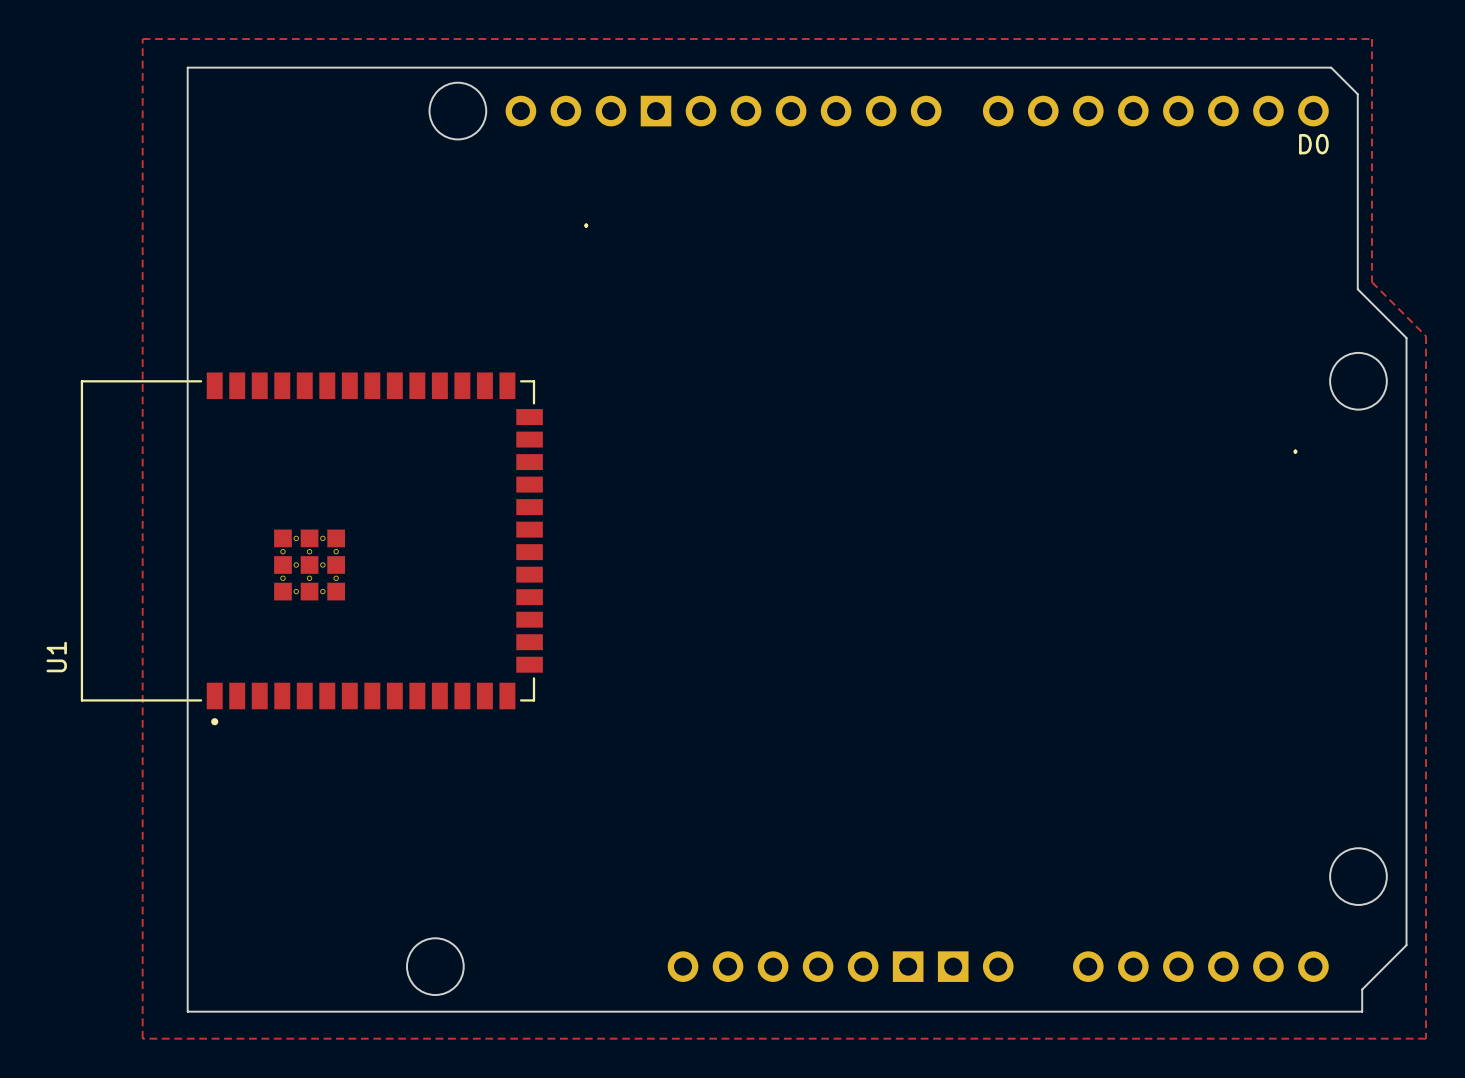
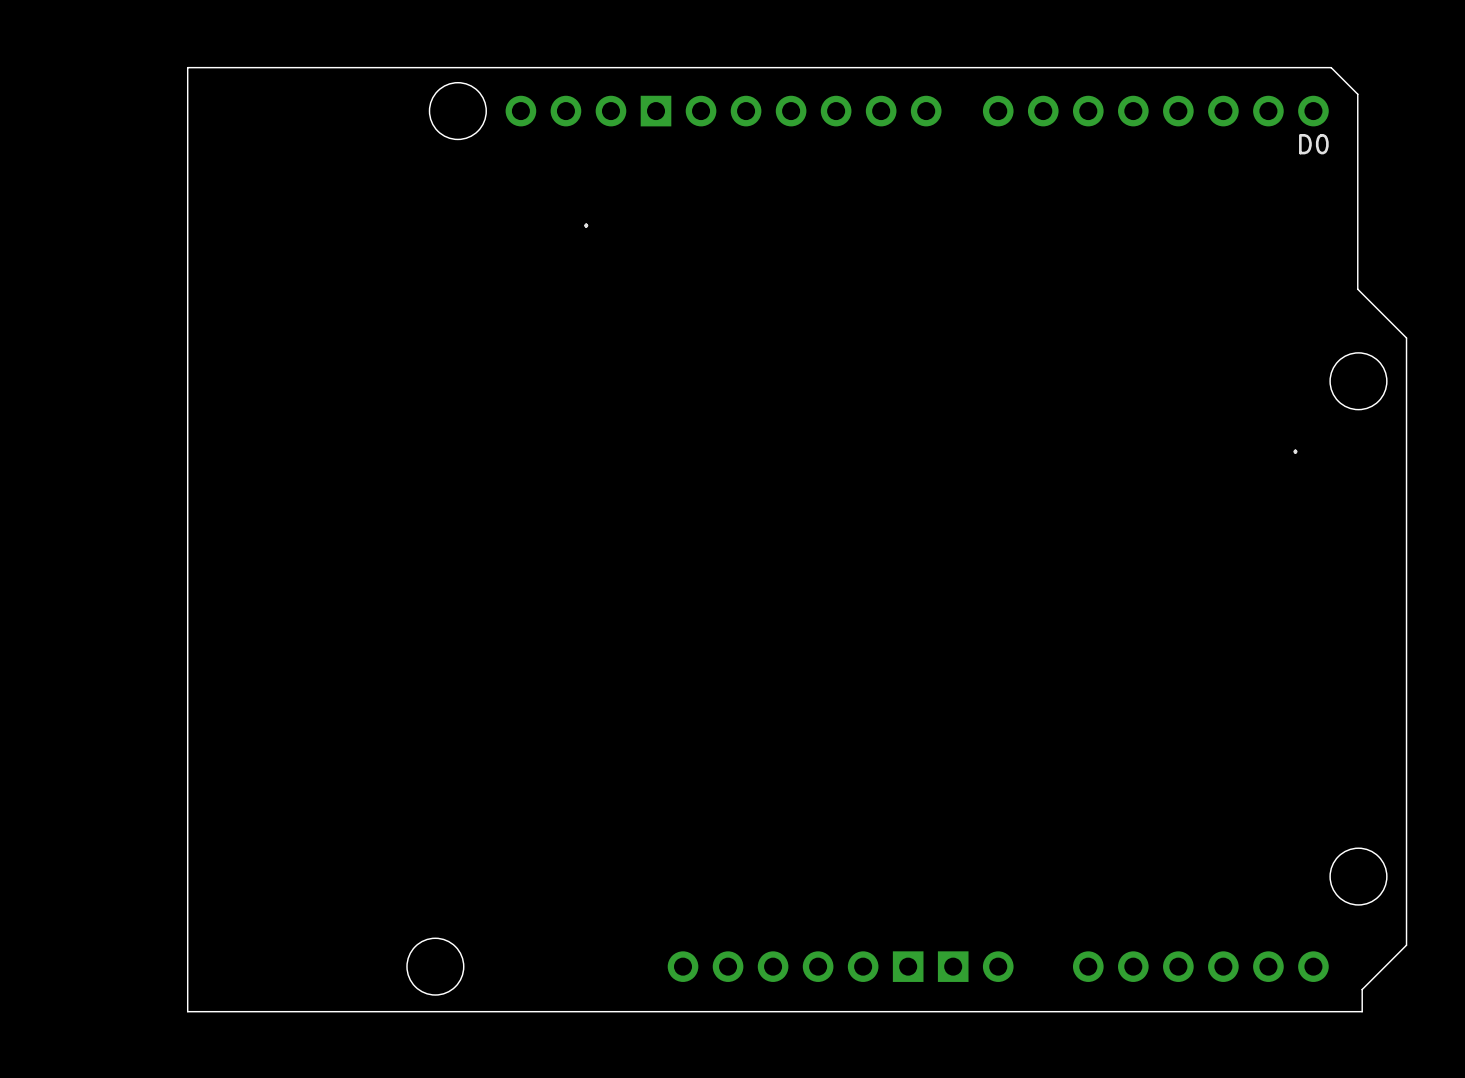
zone outline: (142, 39) (1371, 39) (1371, 282) (1426, 336) (1426, 1038) (142, 1038) (142, 39) -> none
U1: (311, 548) -> none

